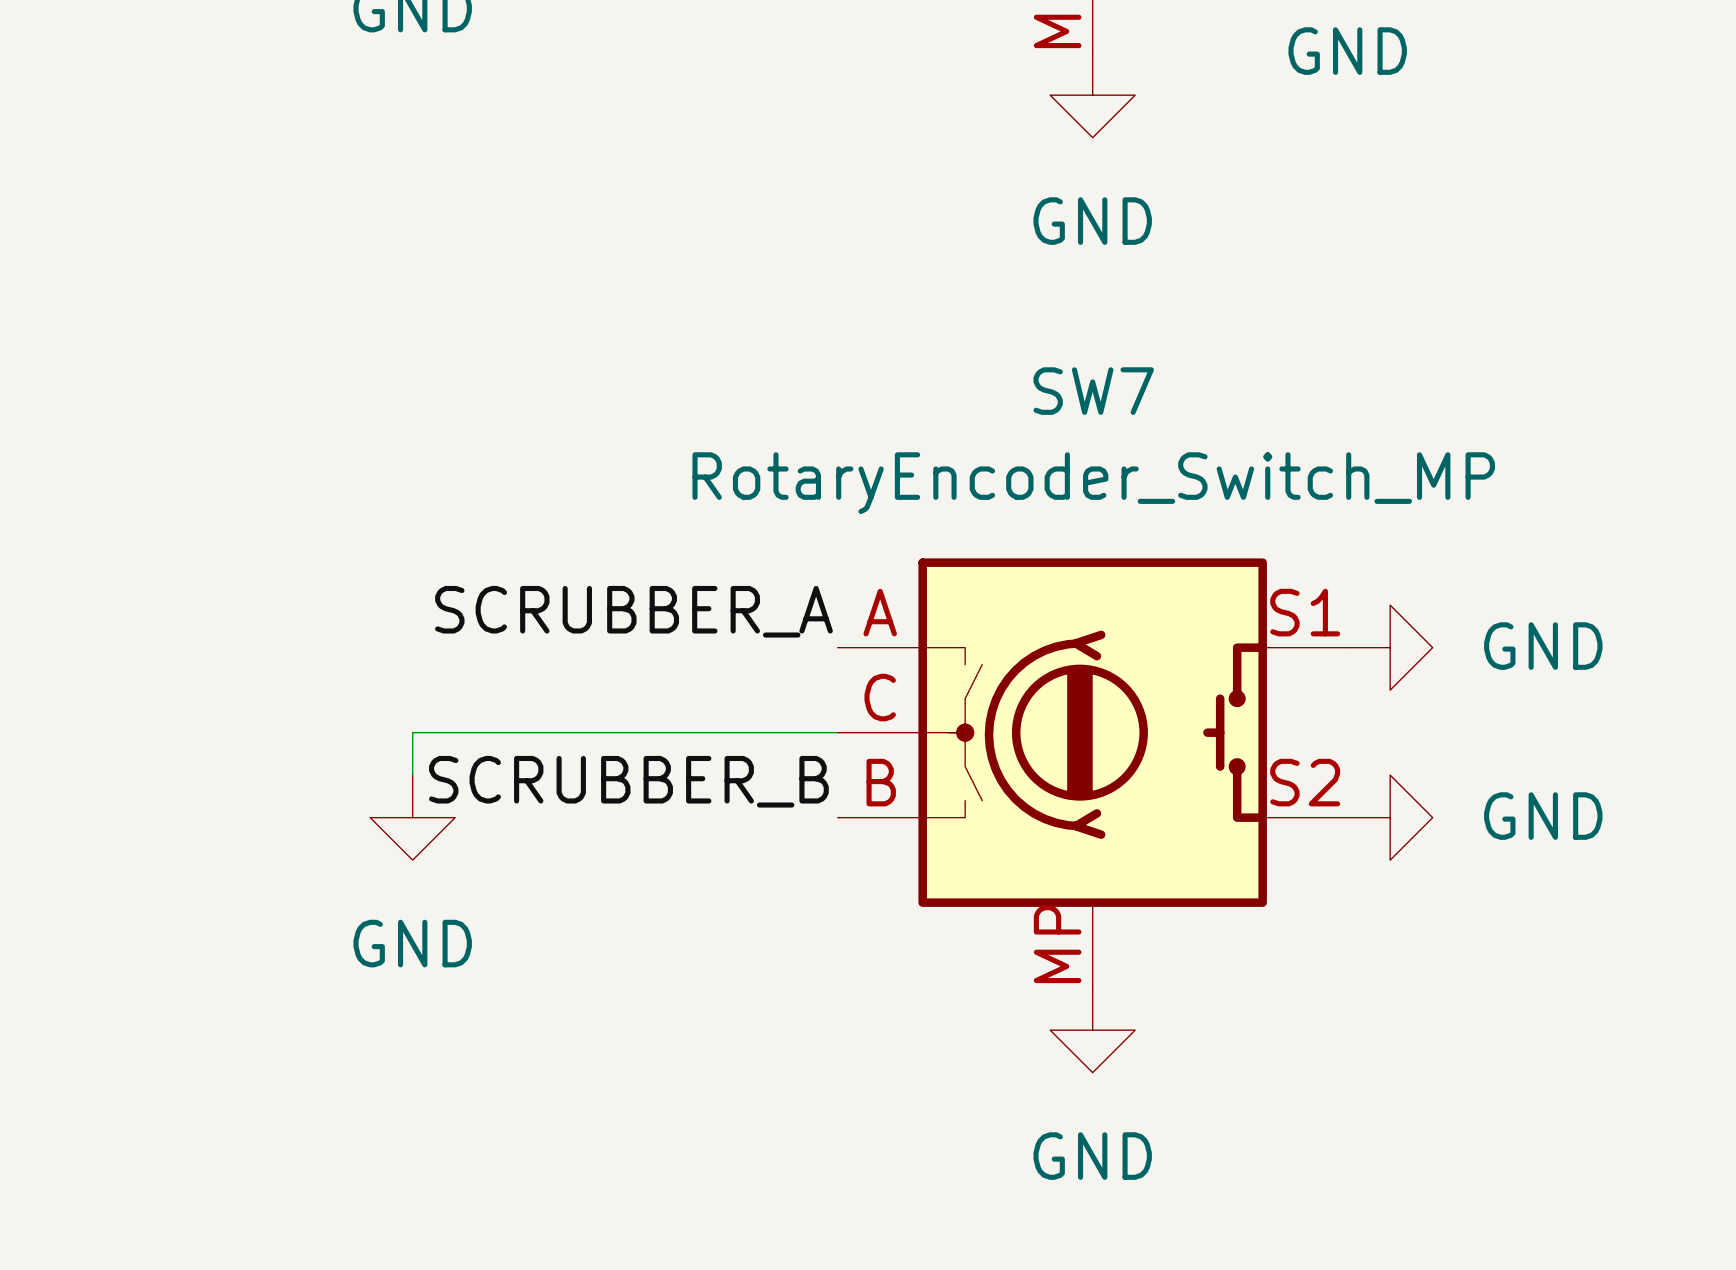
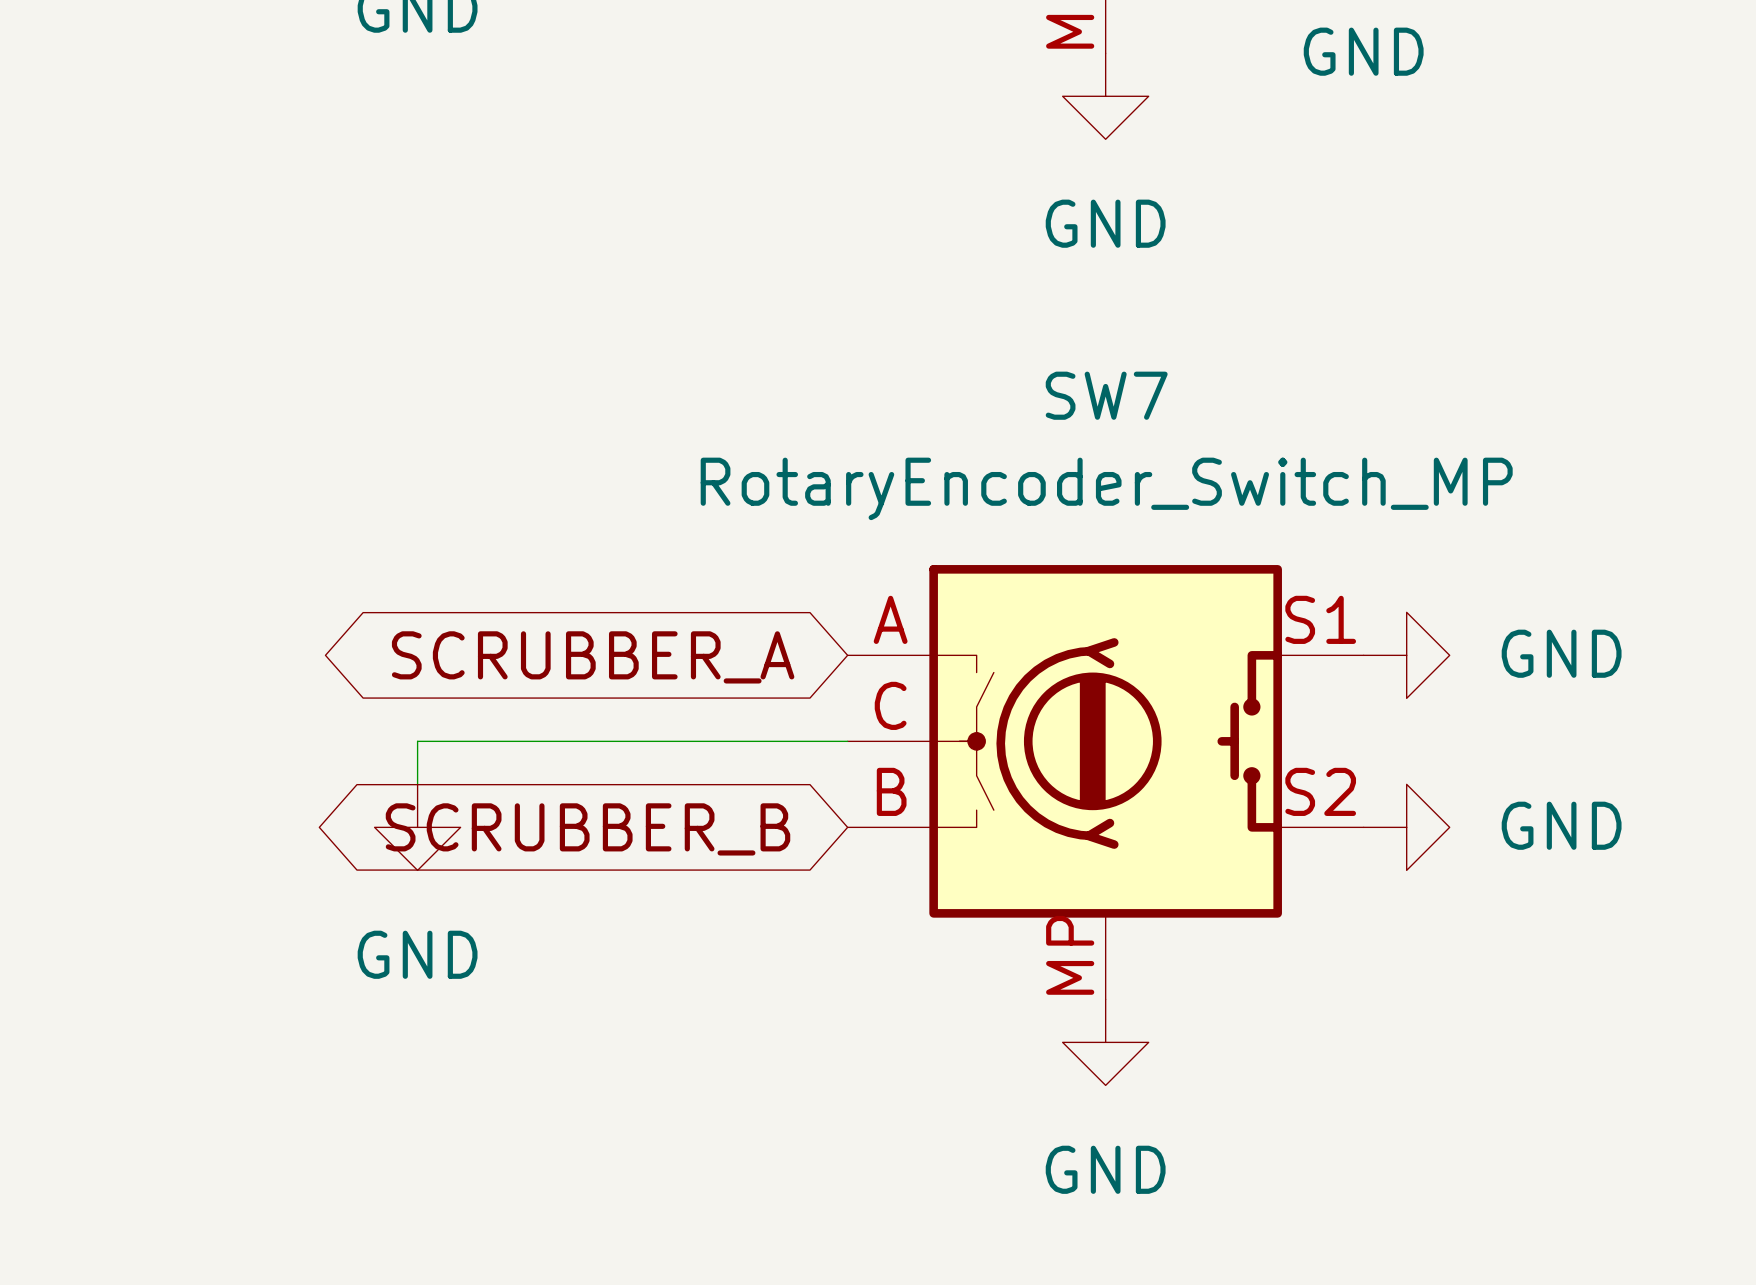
label: SCRUBBER_A (633, 611) -> none
global label: none -> SCRUBBER_A (593, 657)
label: SCRUBBER_B (628, 781) -> none
global label: none -> SCRUBBER_B (588, 829)

